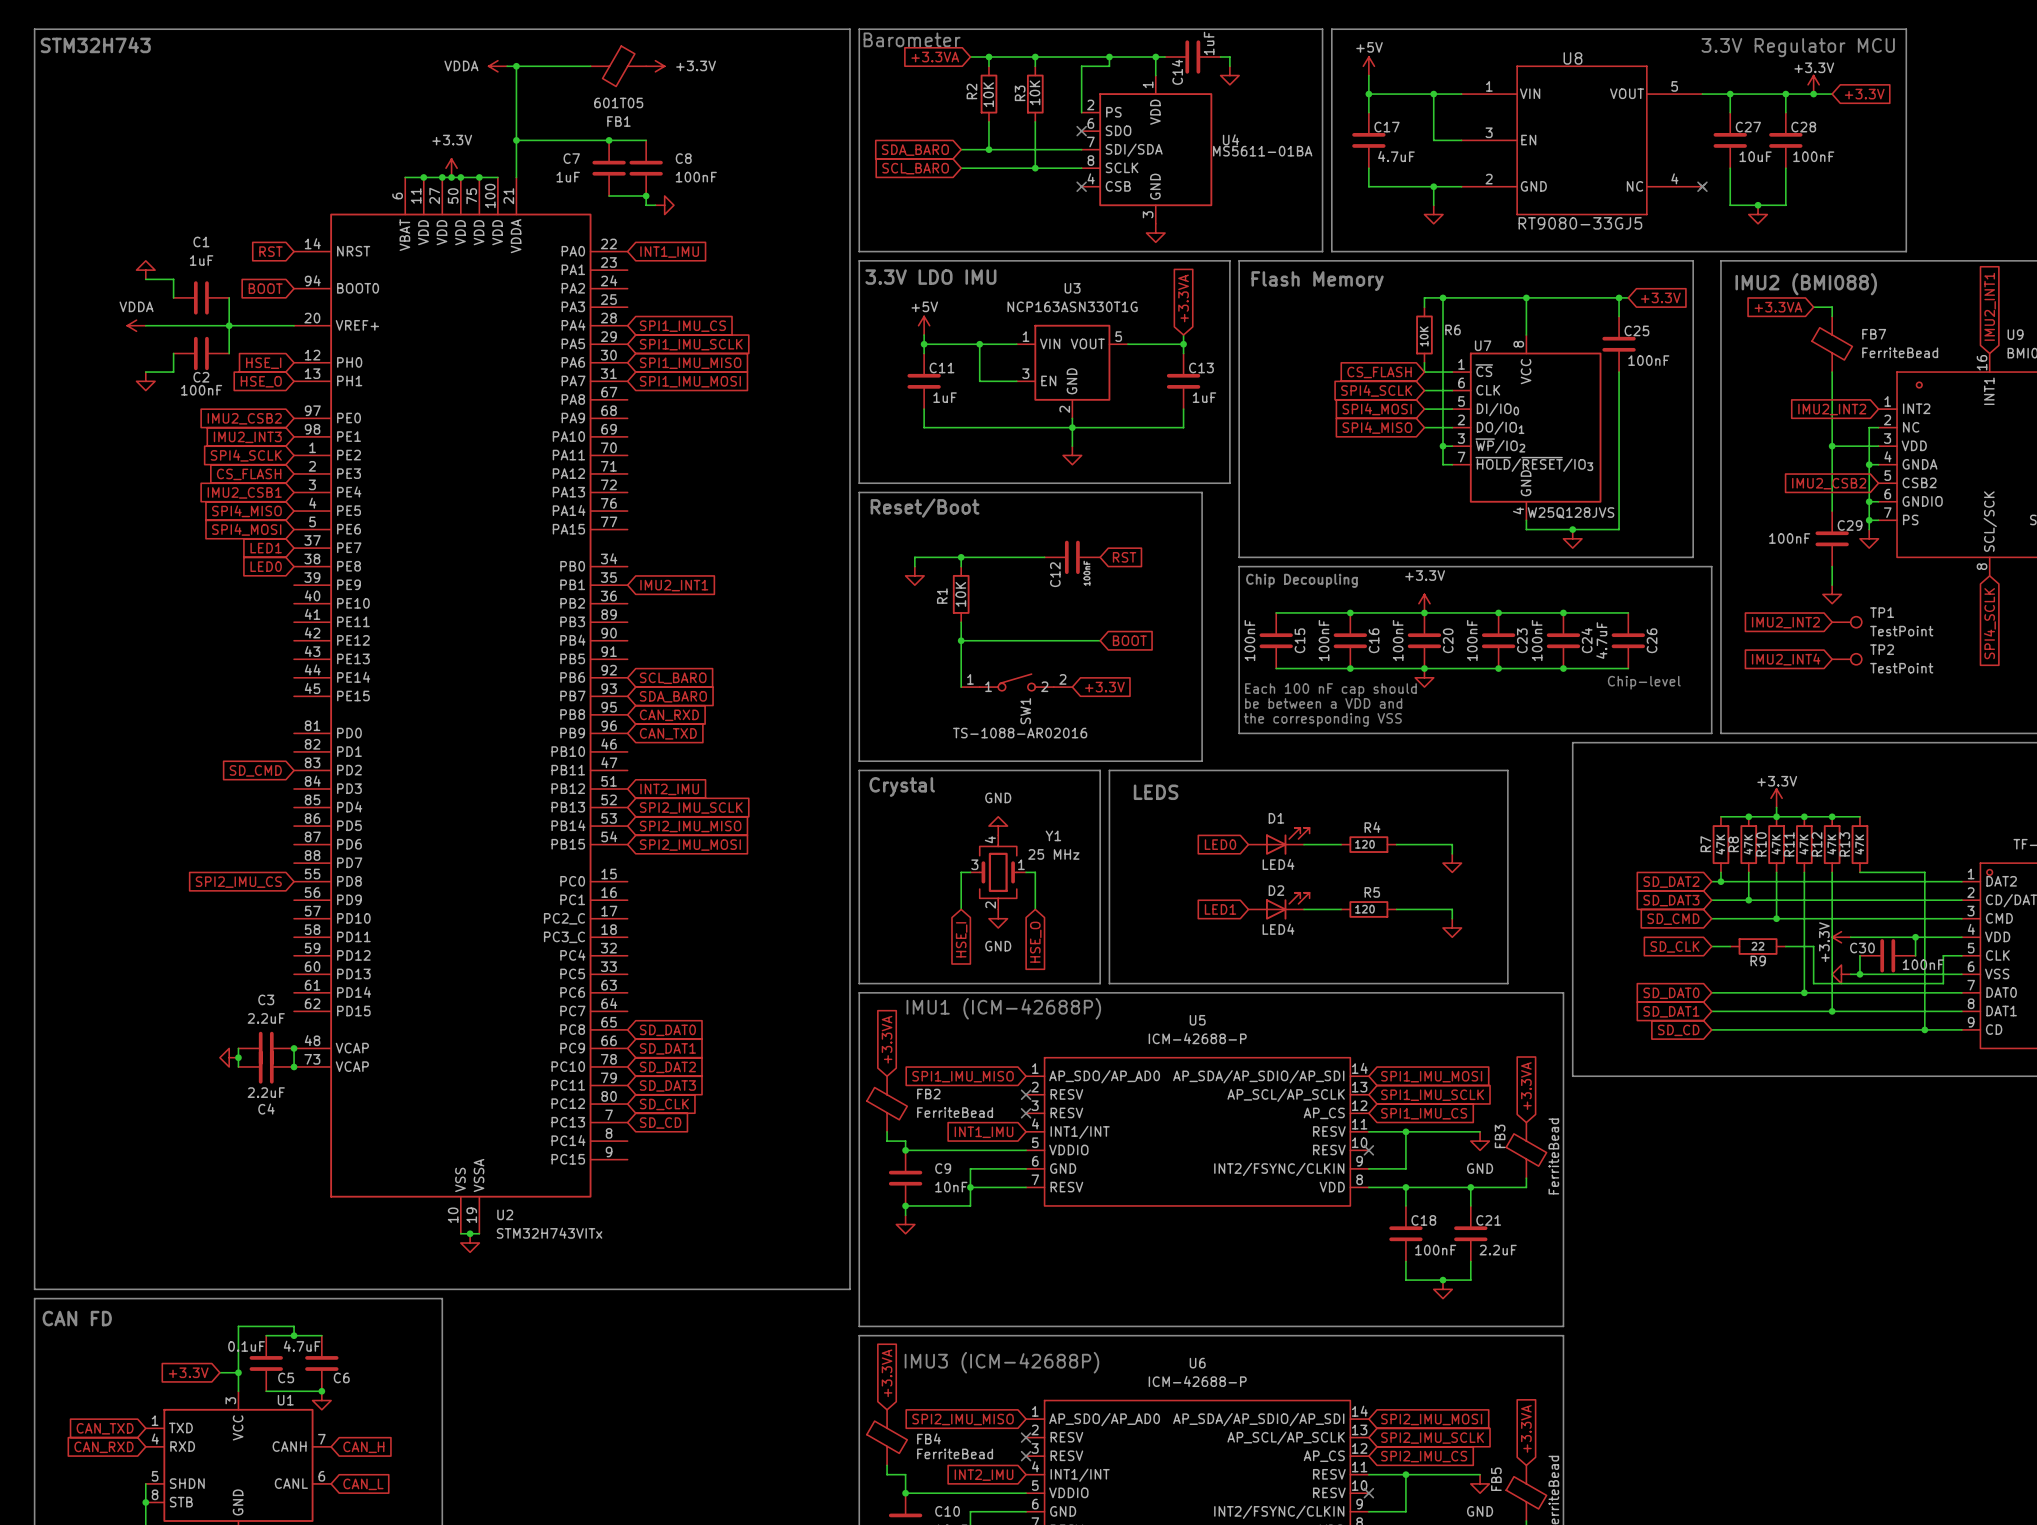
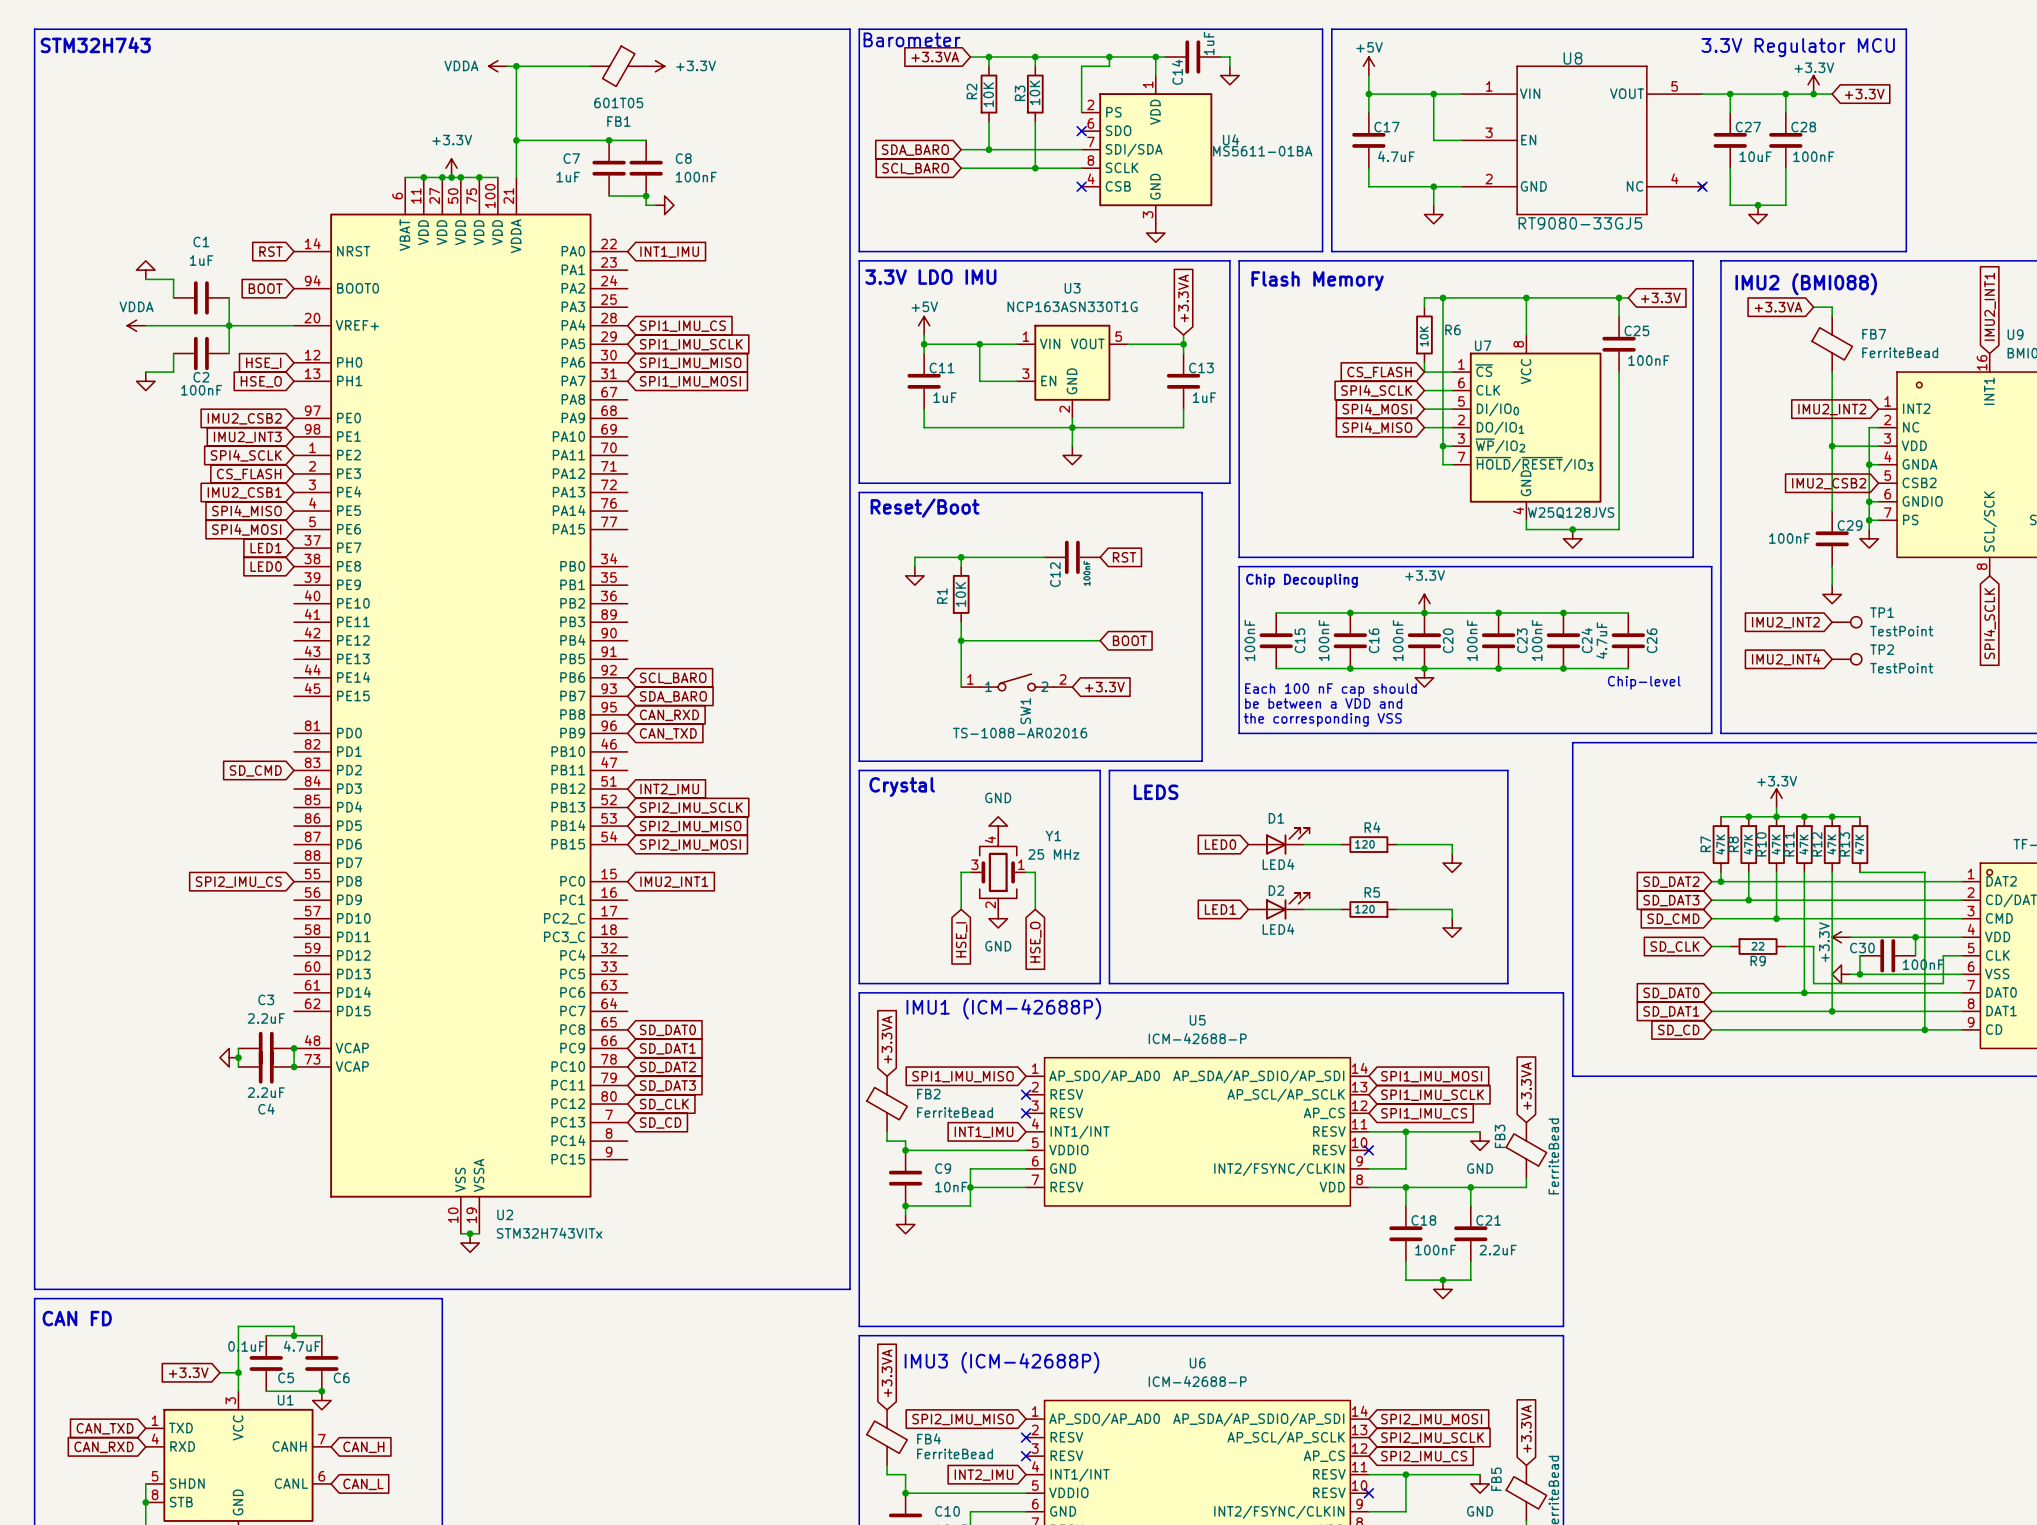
global label: IMU2_INT1 (674, 585) -> none
global label: none -> IMU2_INT1 (674, 882)

